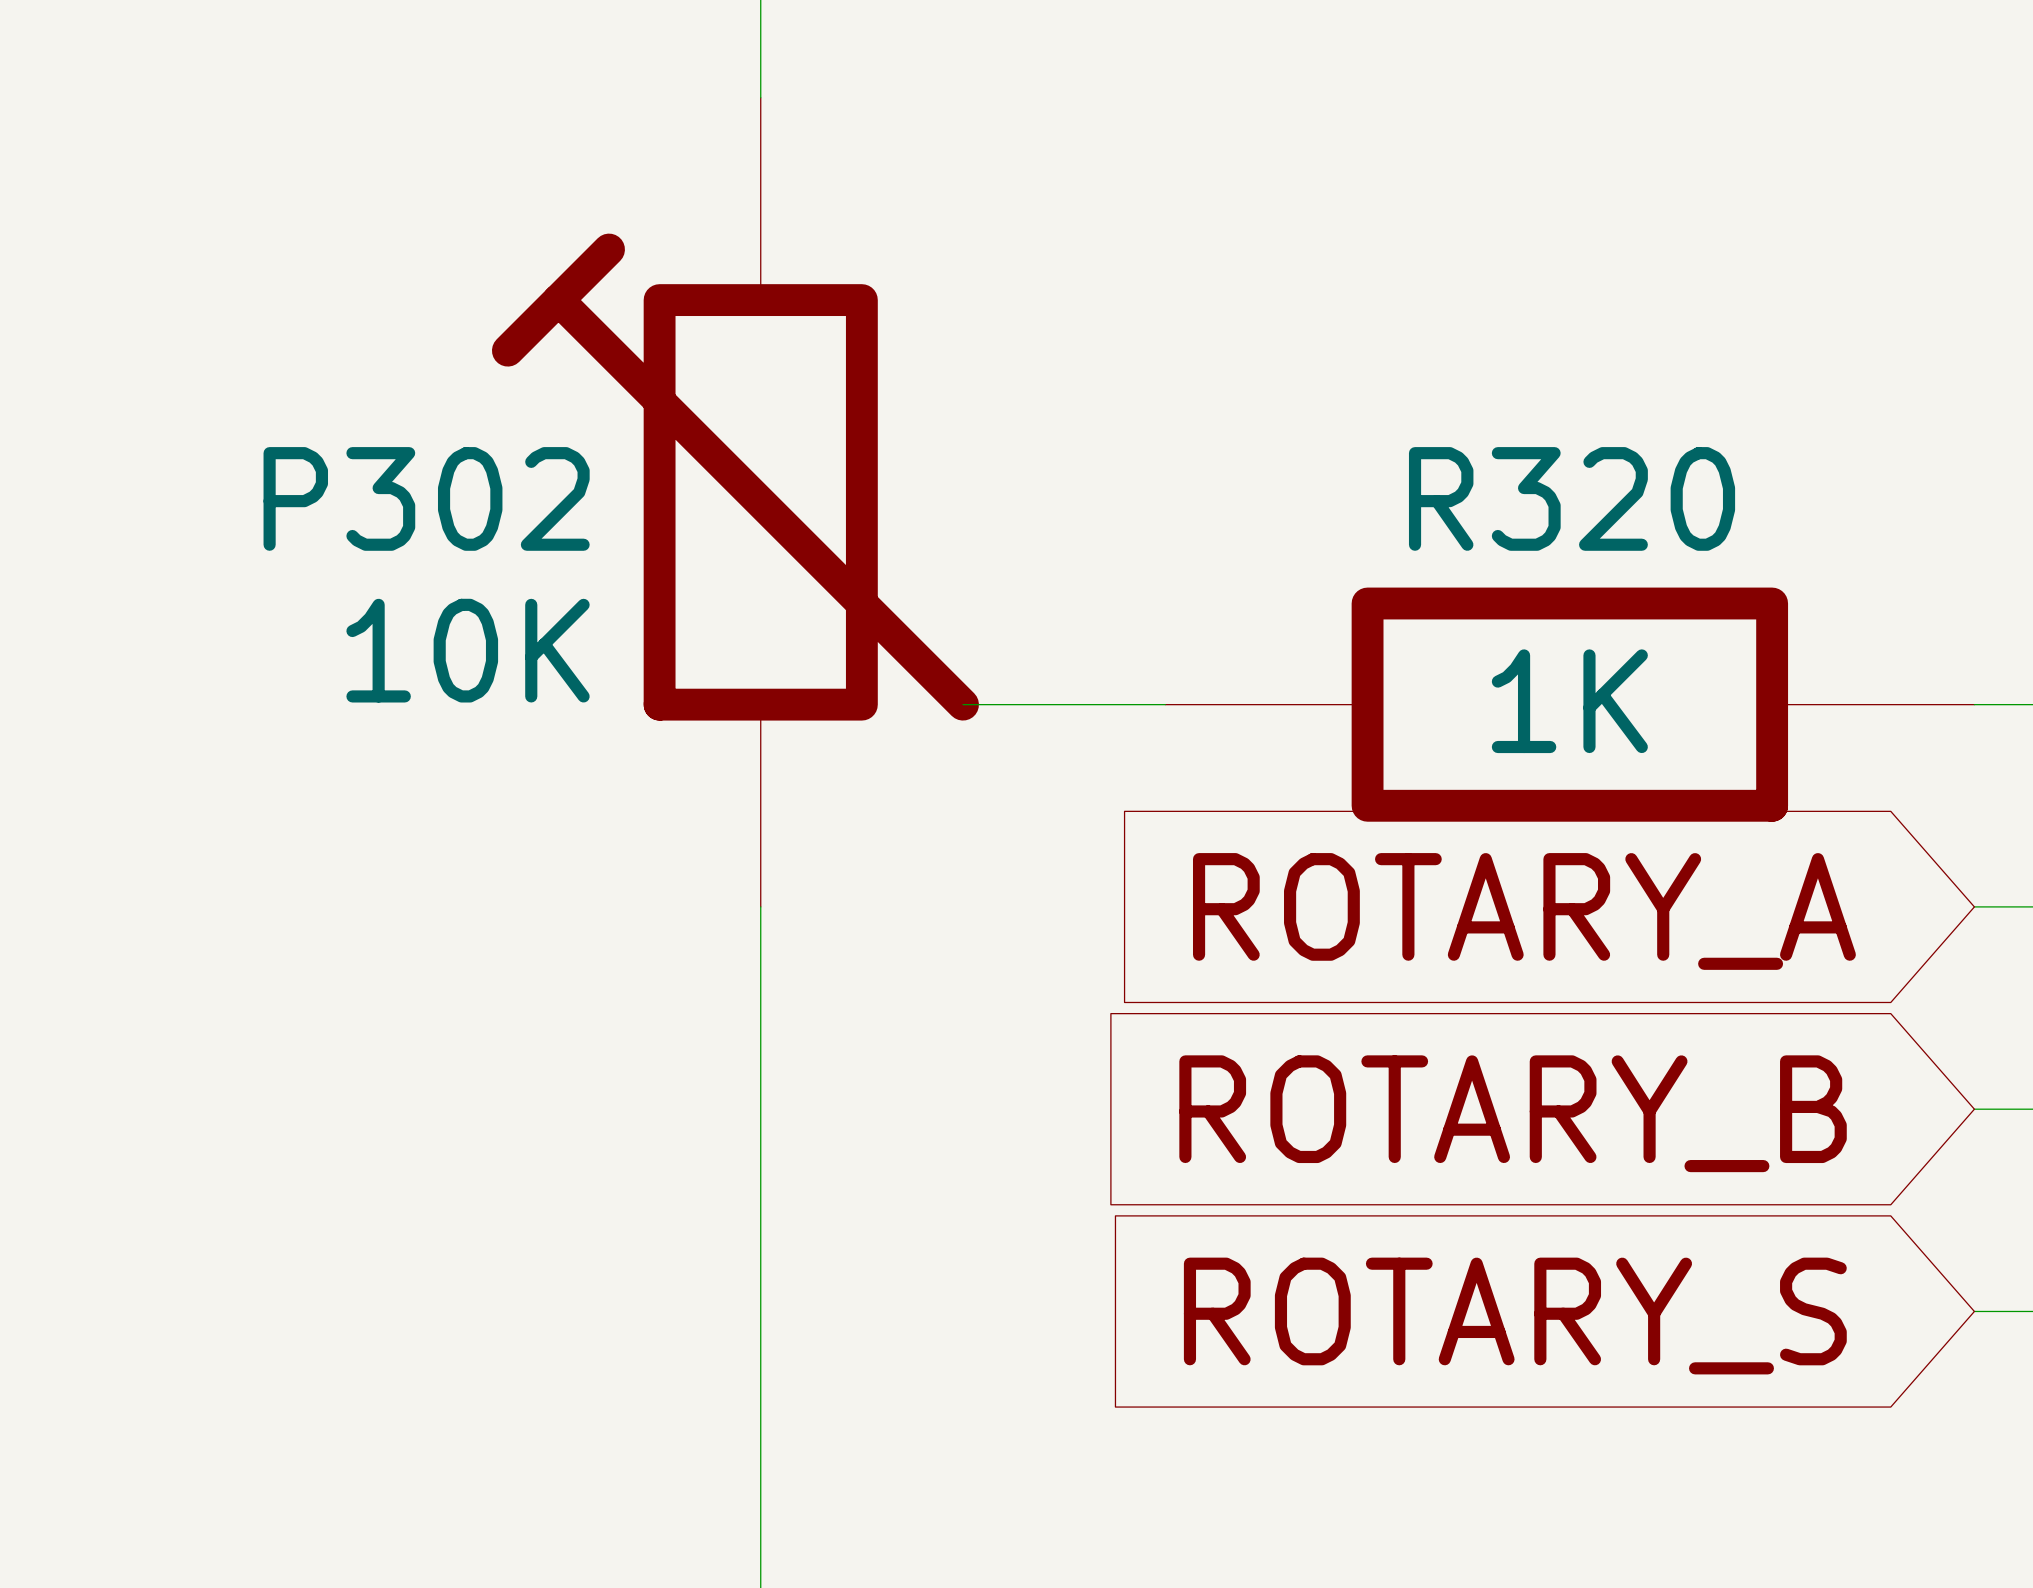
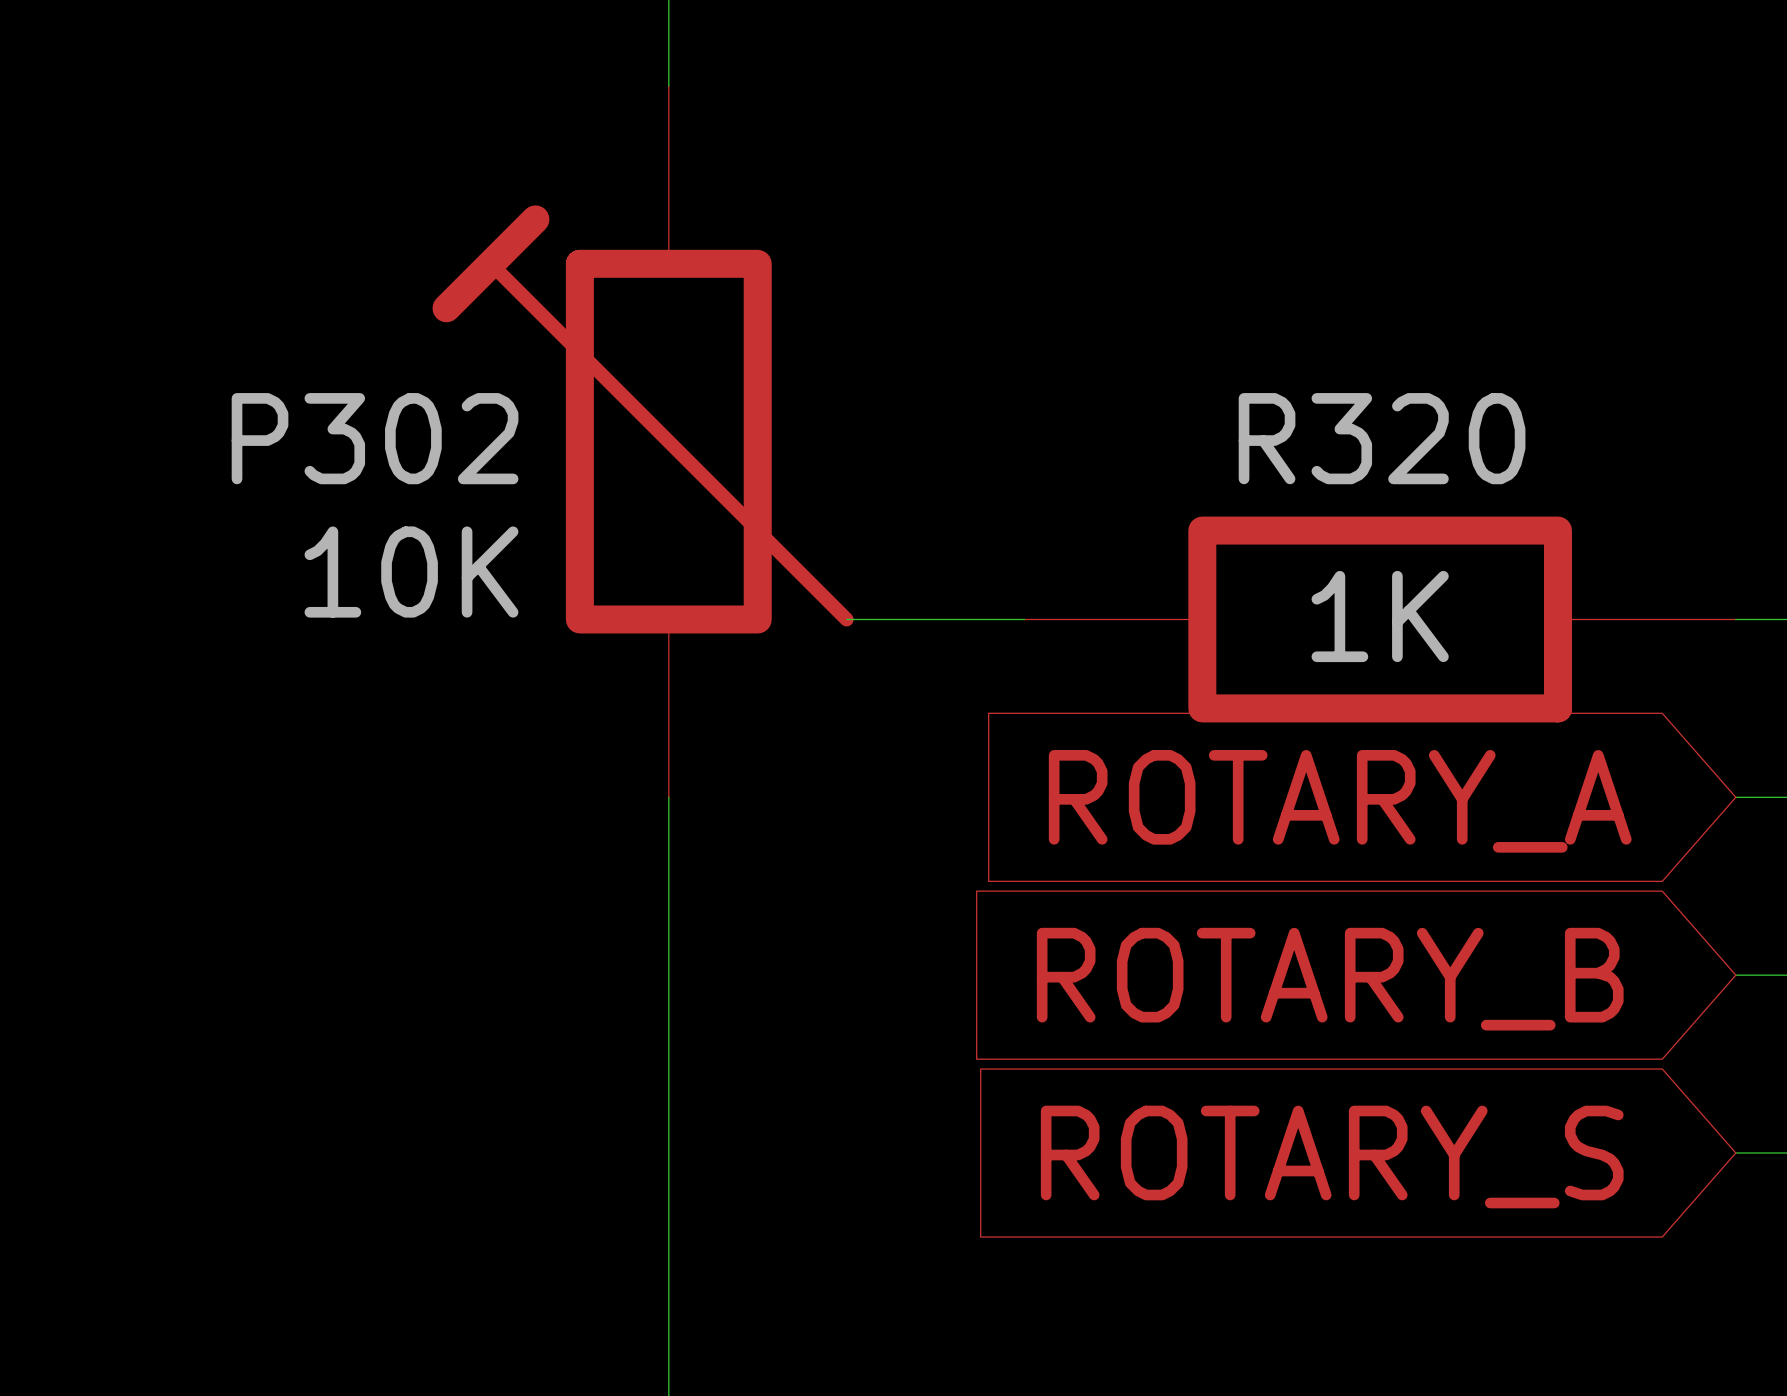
P302 symbol: [491, 97, 979, 907] -> [432, 85, 854, 798]

